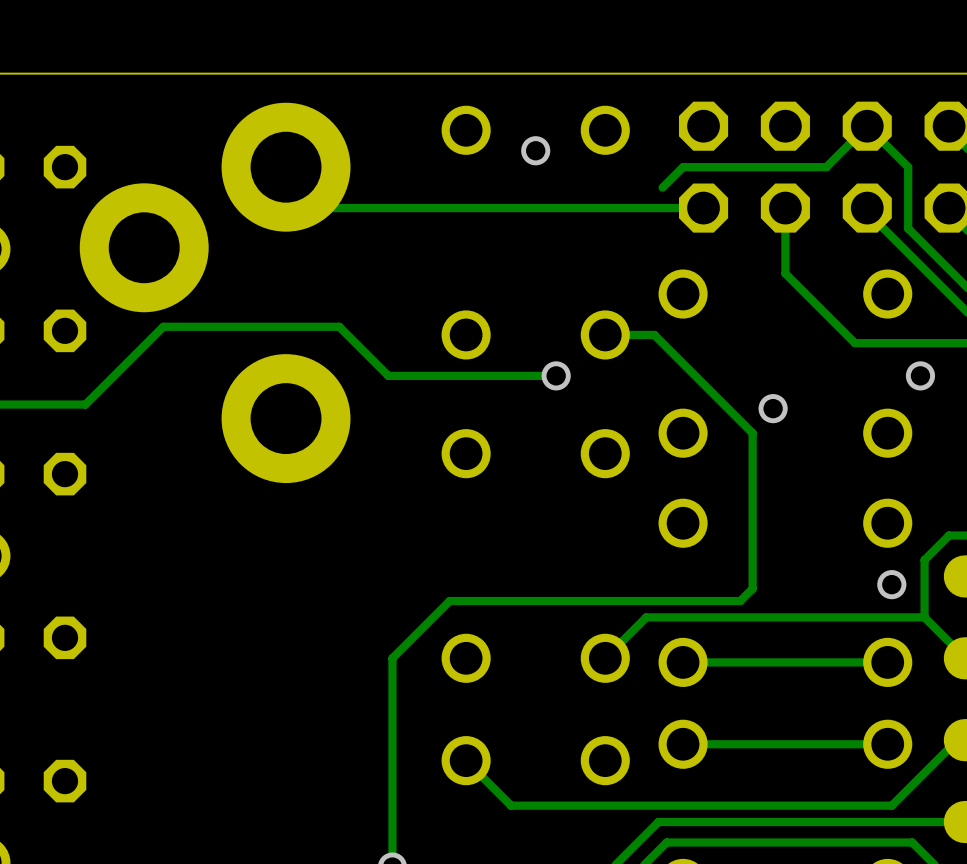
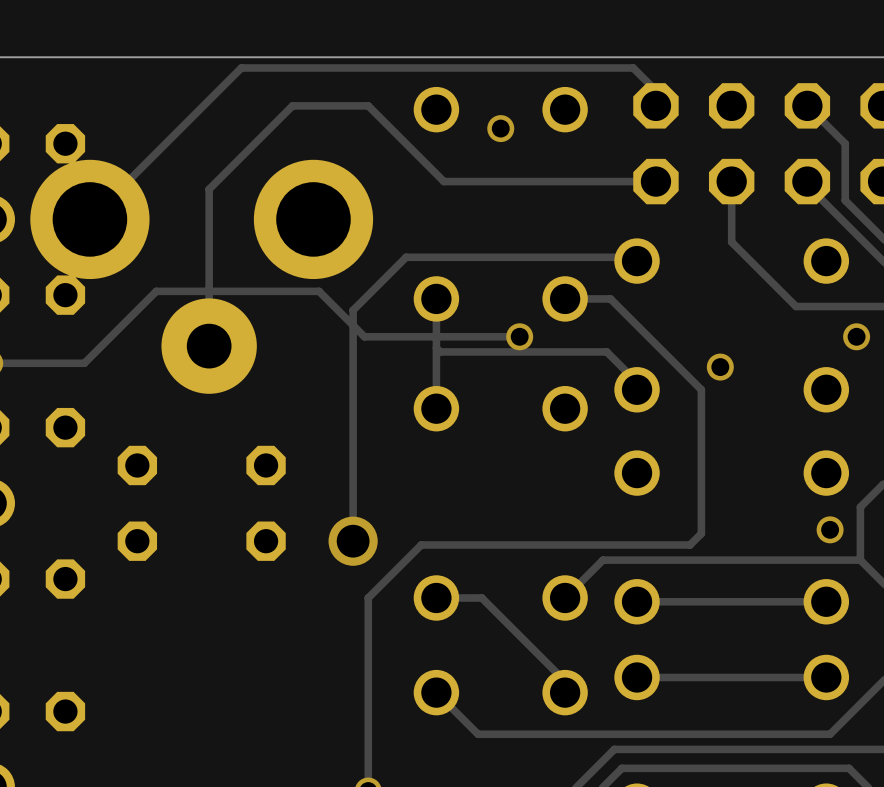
part footprint: [79, 102, 351, 484] -> [30, 159, 374, 394]
track: none -> (655, 105) (655, 90) (633, 68) (241, 68) (89, 219)
track: (867, 126) (826, 167) (683, 167) (662, 187) -> none
track: (286, 167) (326, 208) (474, 208) -> (209, 346) (209, 189) (292, 105) (368, 105) (443, 181)
track: none -> (633, 257) (406, 257) (353, 310) (353, 541)
track: none -> (436, 298) (436, 408)
track: none -> (436, 348) (440, 351) (606, 351) (637, 382) (637, 389)
part: none -> (137, 503)
part: none -> (266, 503)
via: none -> (353, 541)
track: none -> (436, 597) (481, 597) (565, 681) (565, 692)

